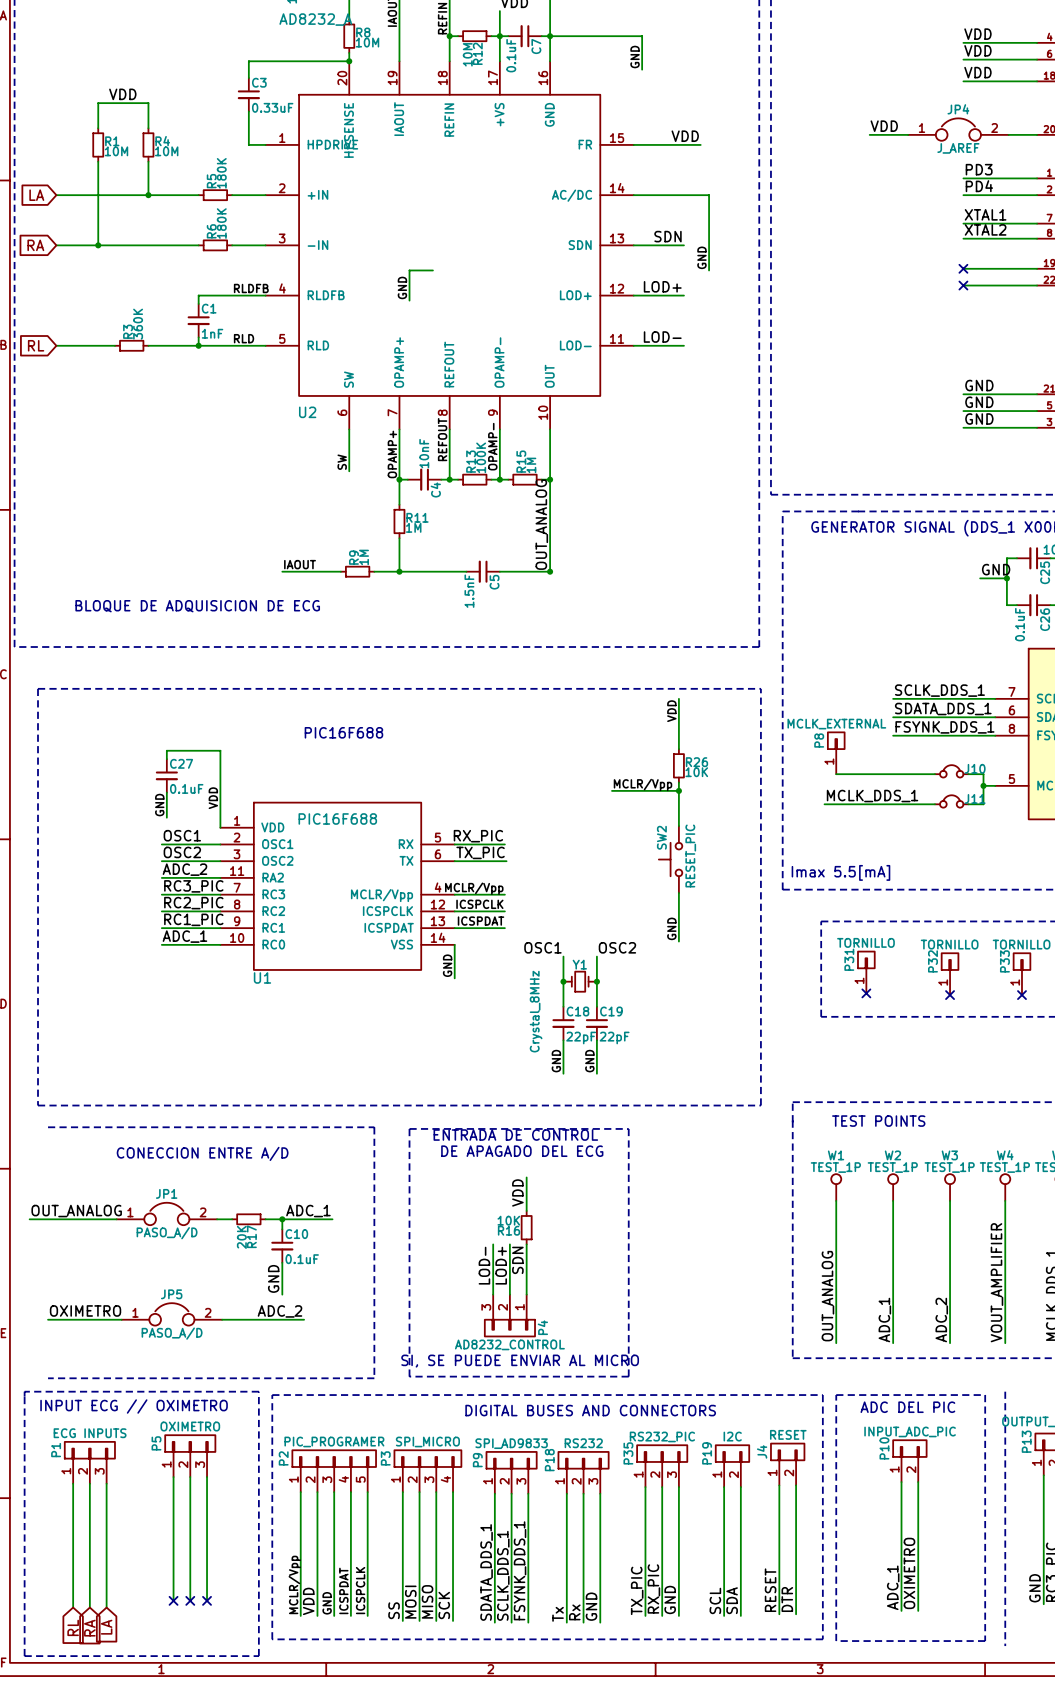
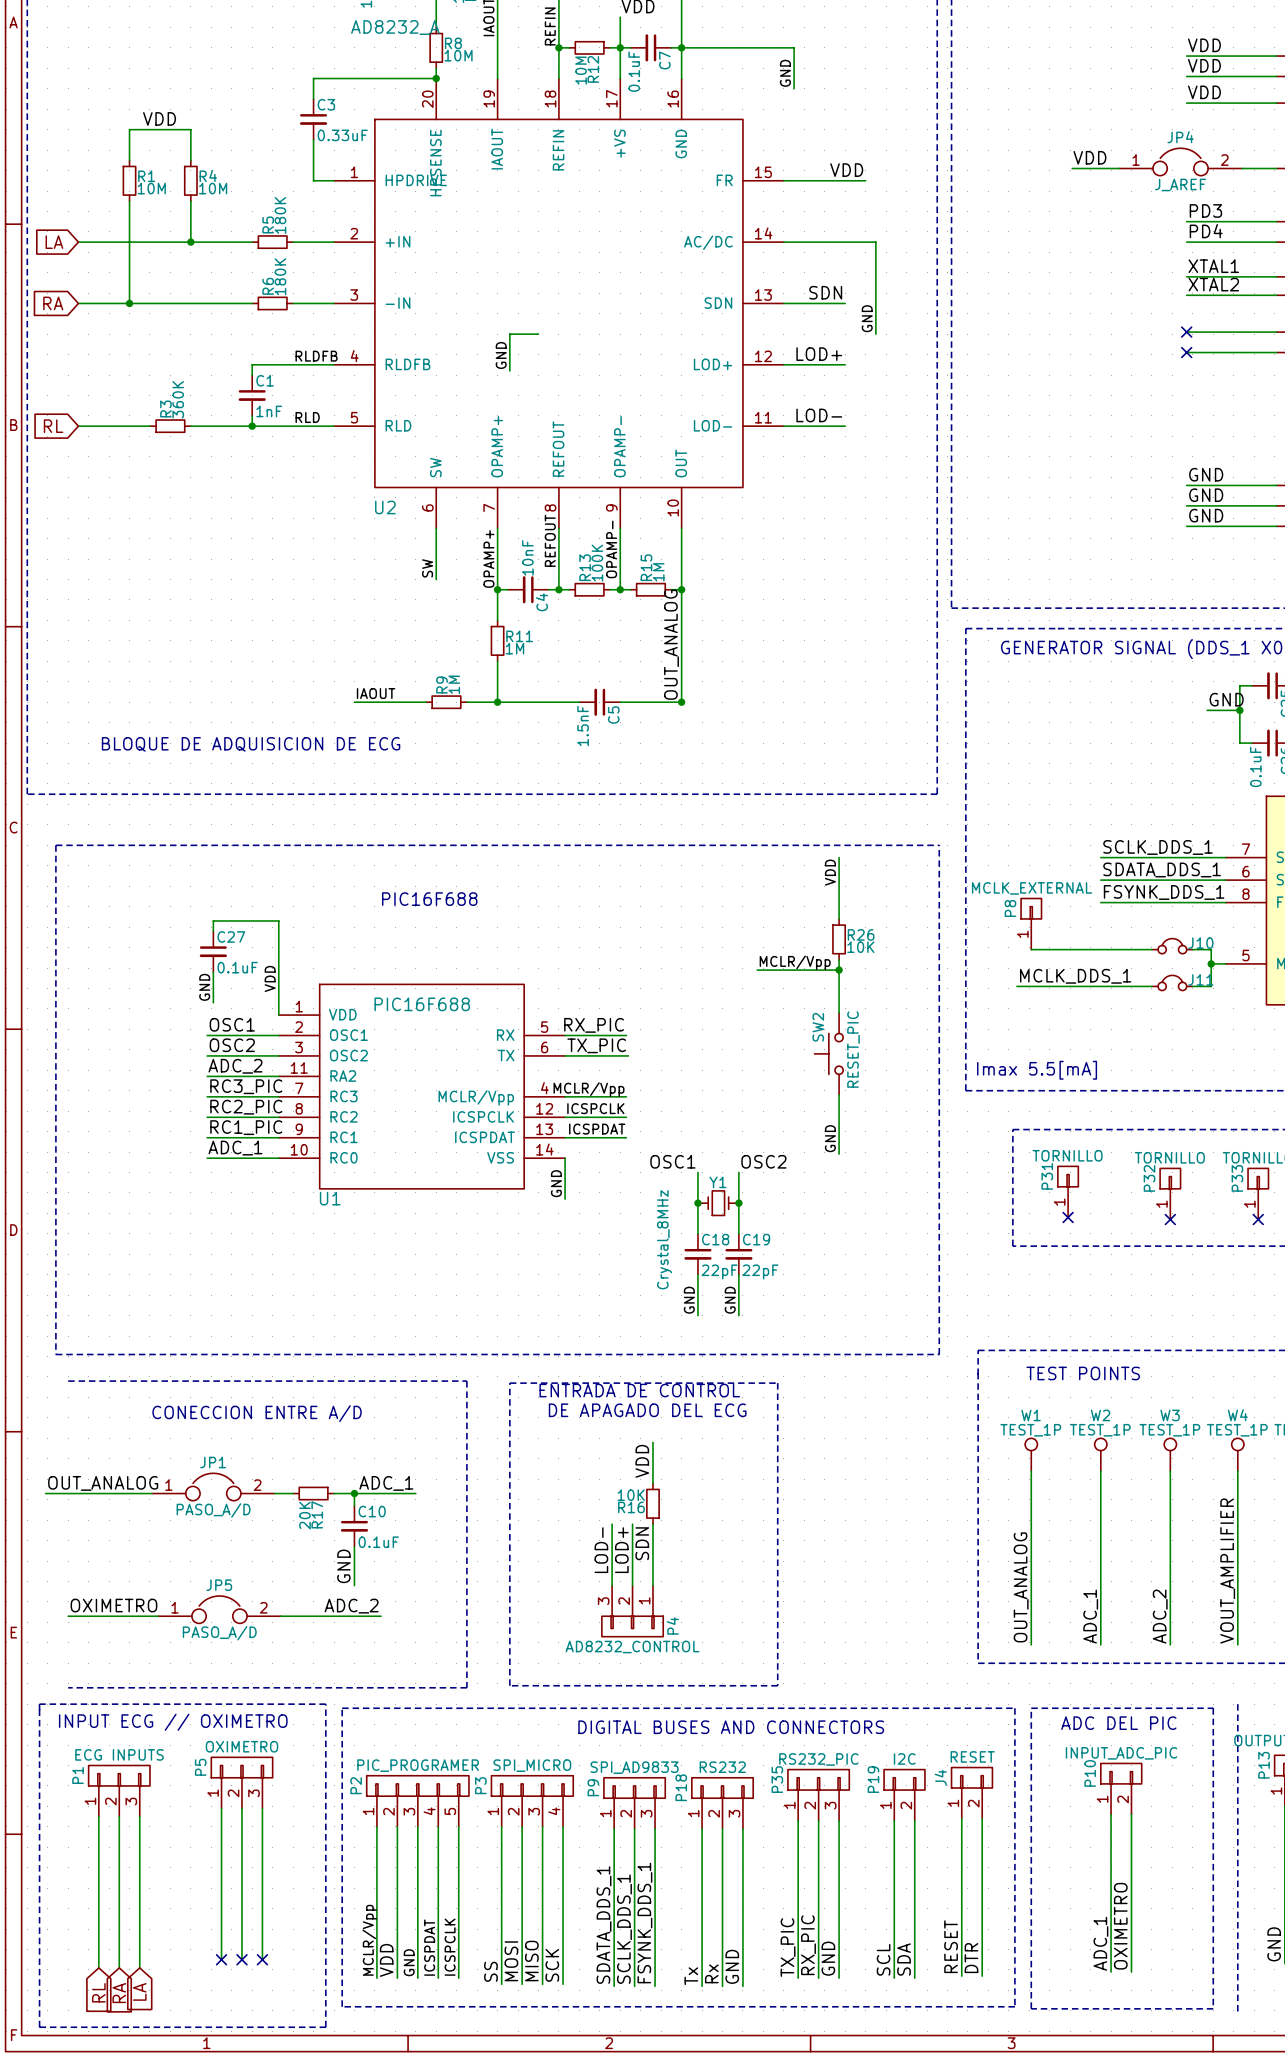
text: SI, SE PUEDE ENVIAR AL MICRO (520, 1361) -> none

